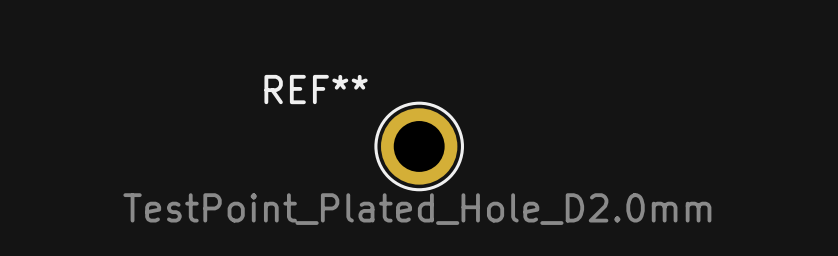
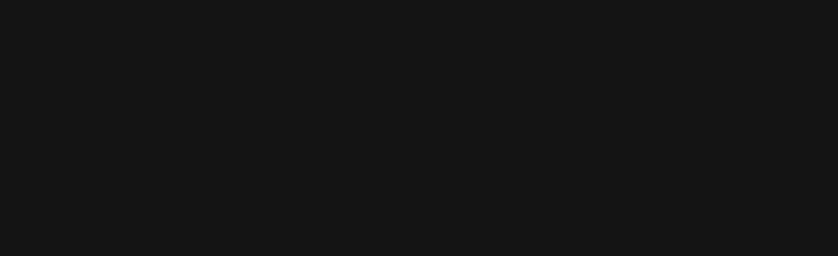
REF**: TestPoint_Plated_Hole_D2.0mm (419, 146) -> none

